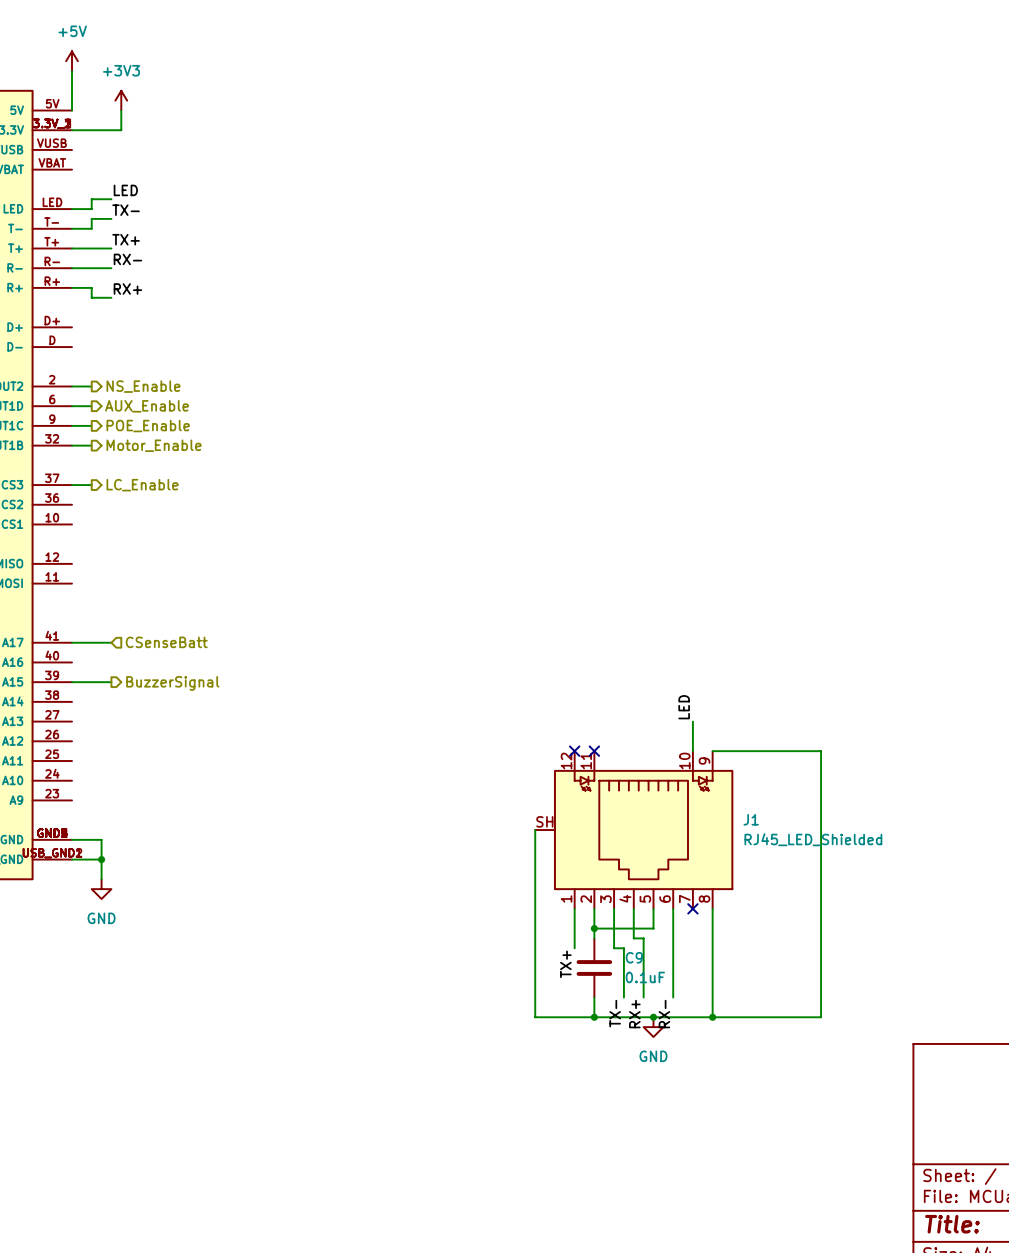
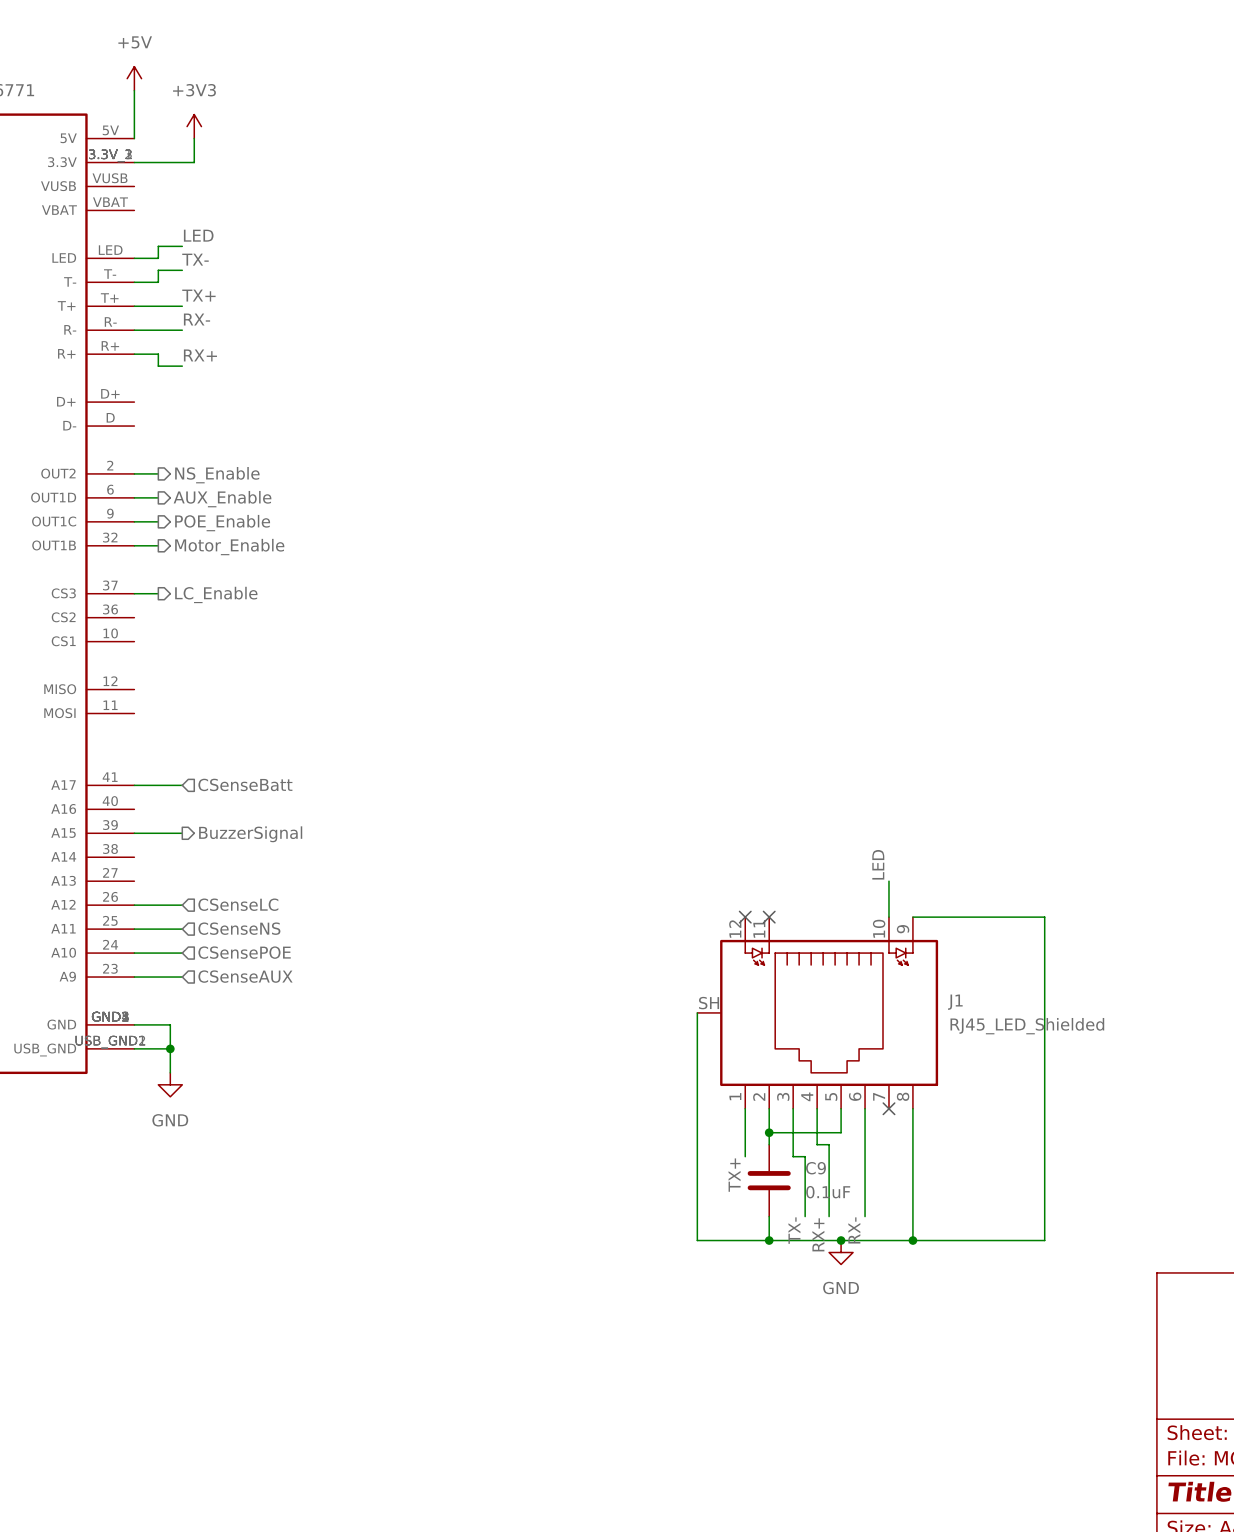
hierarchical label: none -> CSenseLC (238, 904)
wire: none -> (134, 905) (182, 905)
hierarchical label: none -> CSenseNS (239, 928)
wire: none -> (134, 929) (182, 929)
wire: none -> (134, 953) (182, 953)
hierarchical label: none -> CSensePOE (244, 952)
wire: none -> (134, 977) (182, 977)
hierarchical label: none -> CSenseAUX (245, 976)

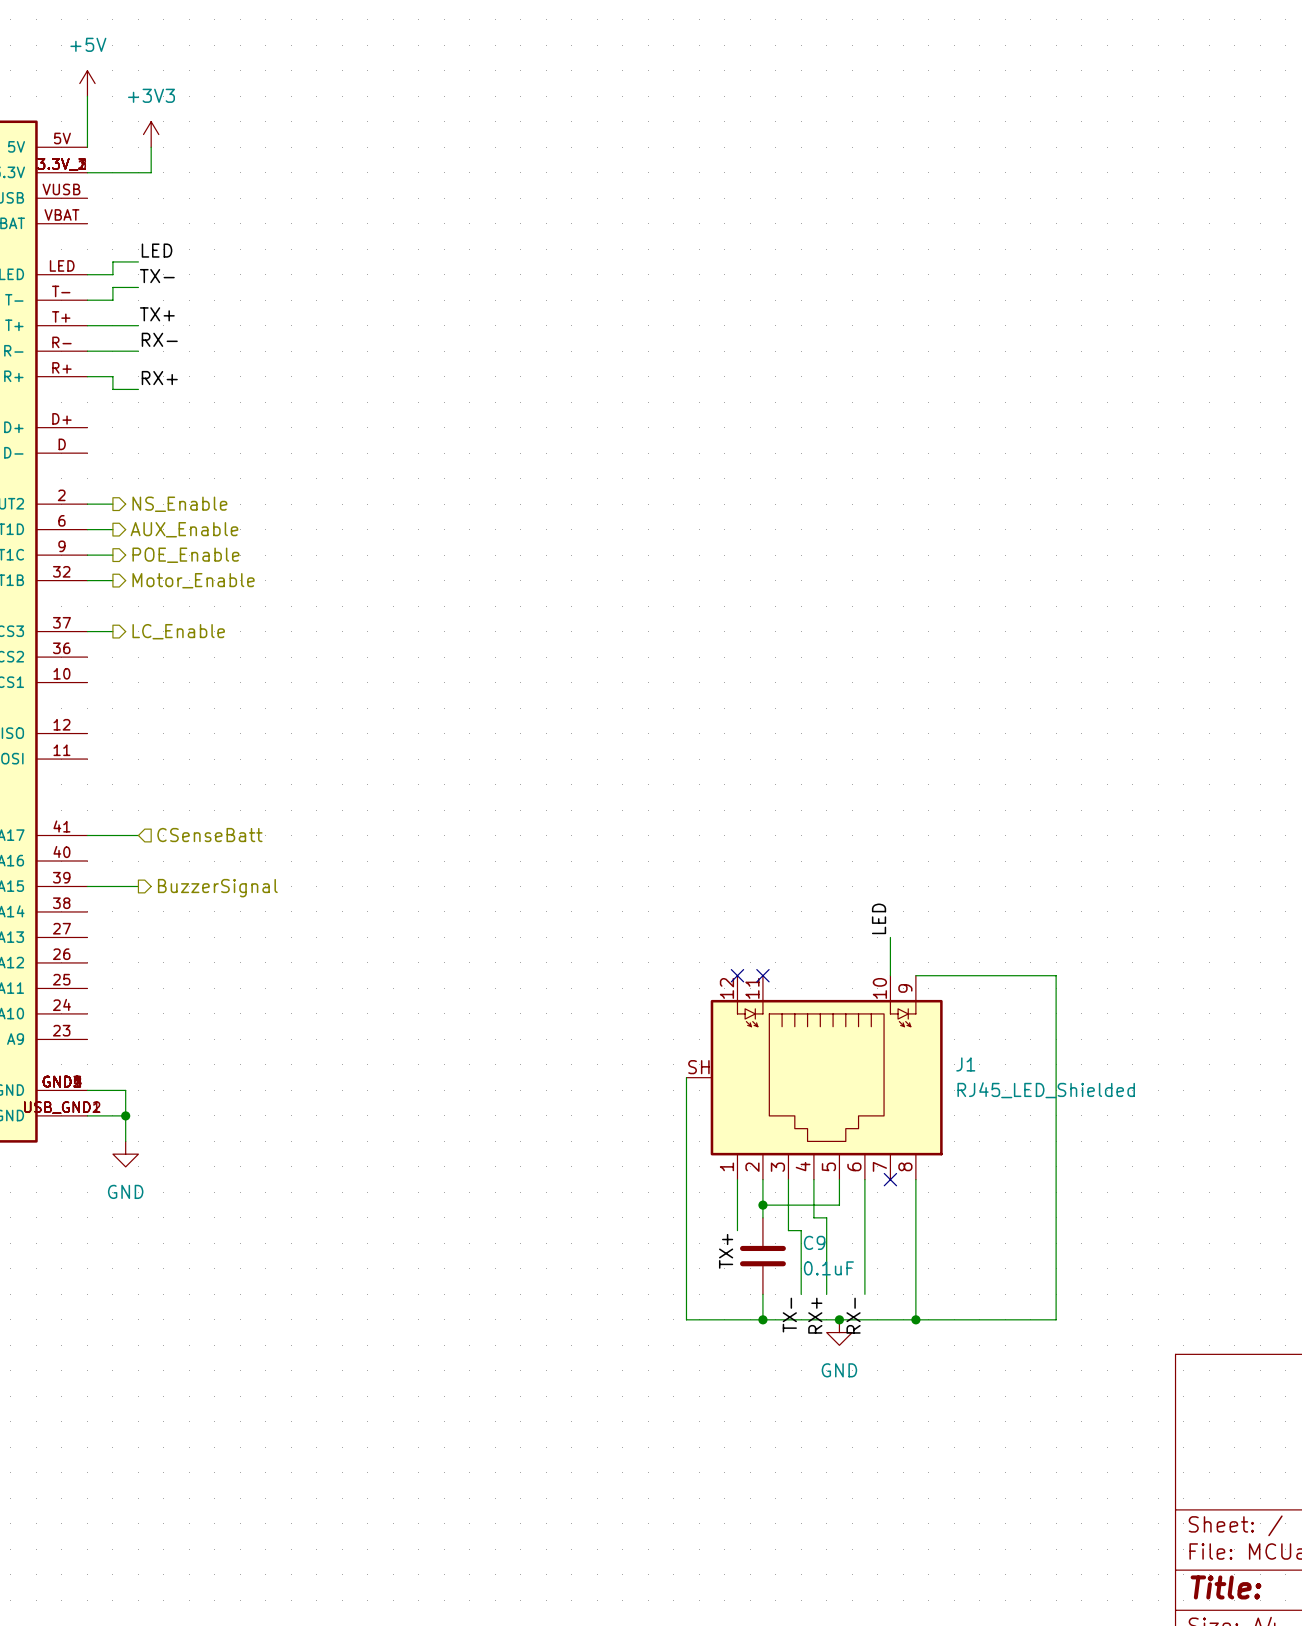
hierarchical label: CSenseLC (238, 904) -> none
wire: (134, 905) (182, 905) -> none
hierarchical label: CSenseNS (239, 928) -> none
wire: (134, 929) (182, 929) -> none
hierarchical label: CSensePOE (244, 952) -> none
wire: (134, 953) (182, 953) -> none
hierarchical label: CSenseAUX (245, 976) -> none
wire: (134, 977) (182, 977) -> none

